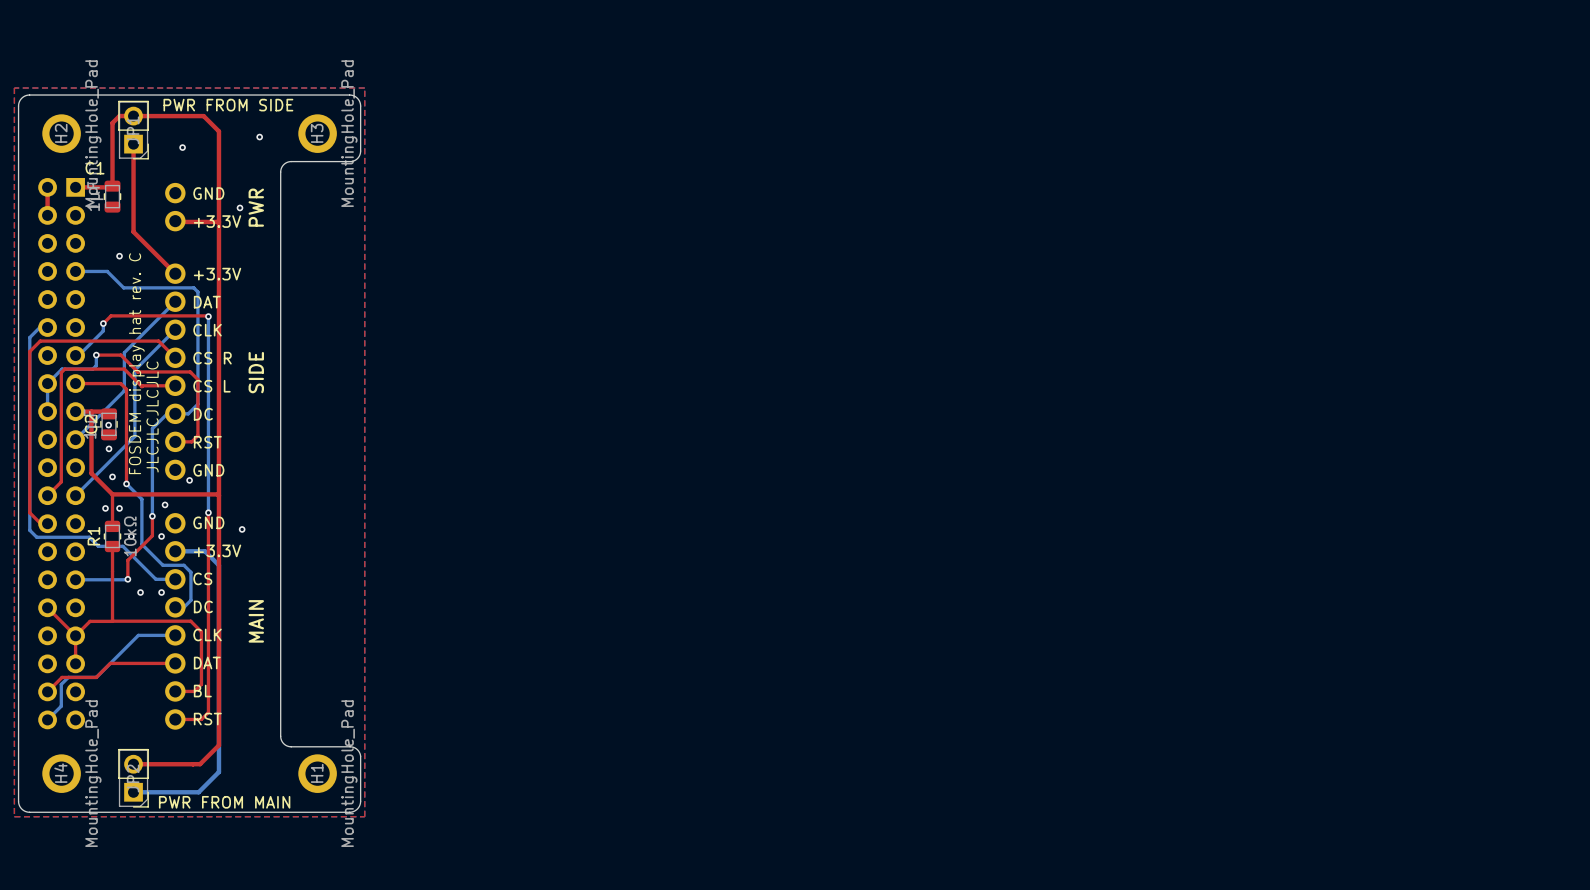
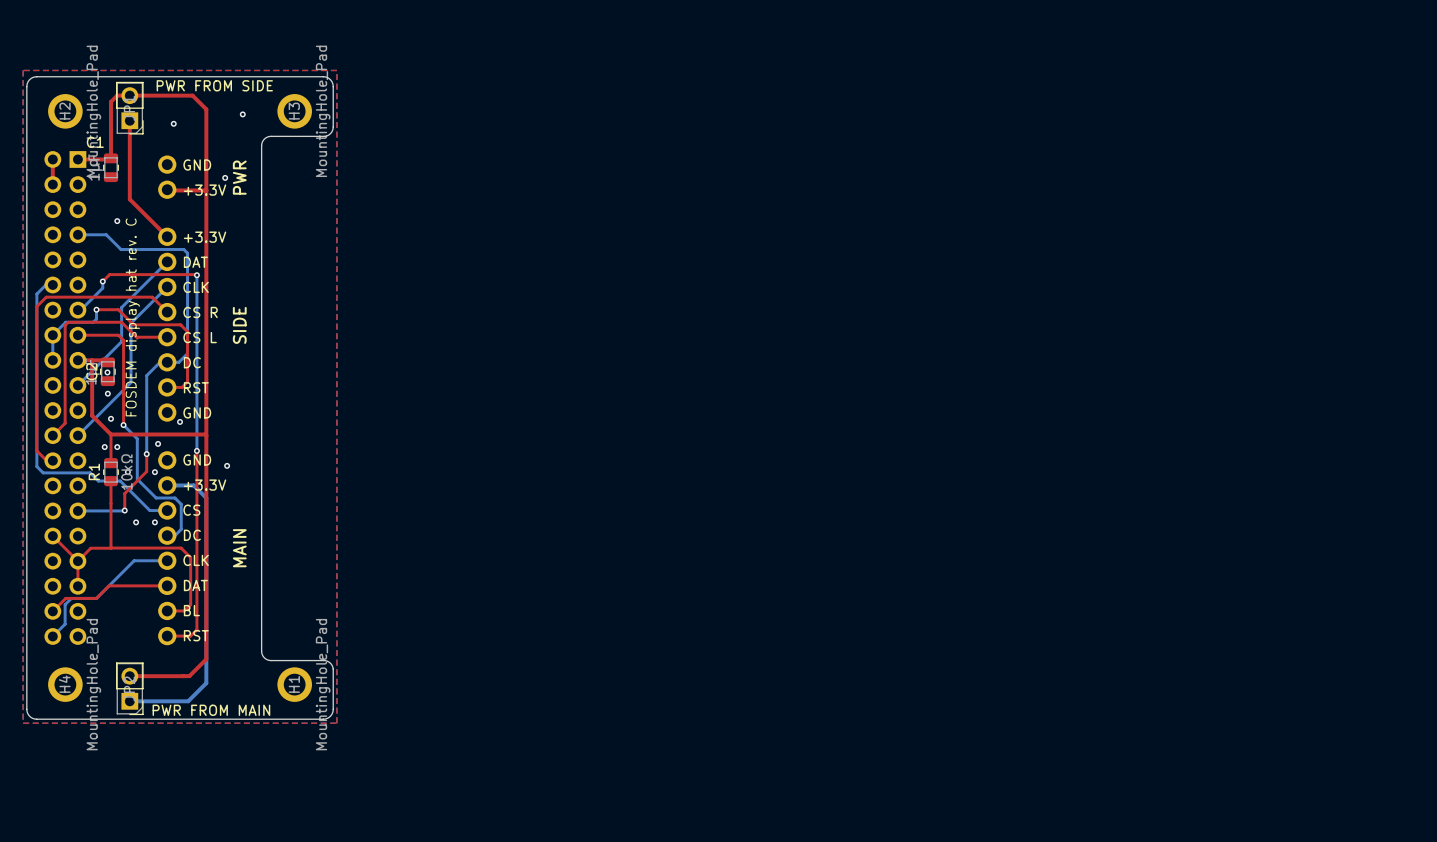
text: JLCJLCJLCJLC (152, 417) -> none

